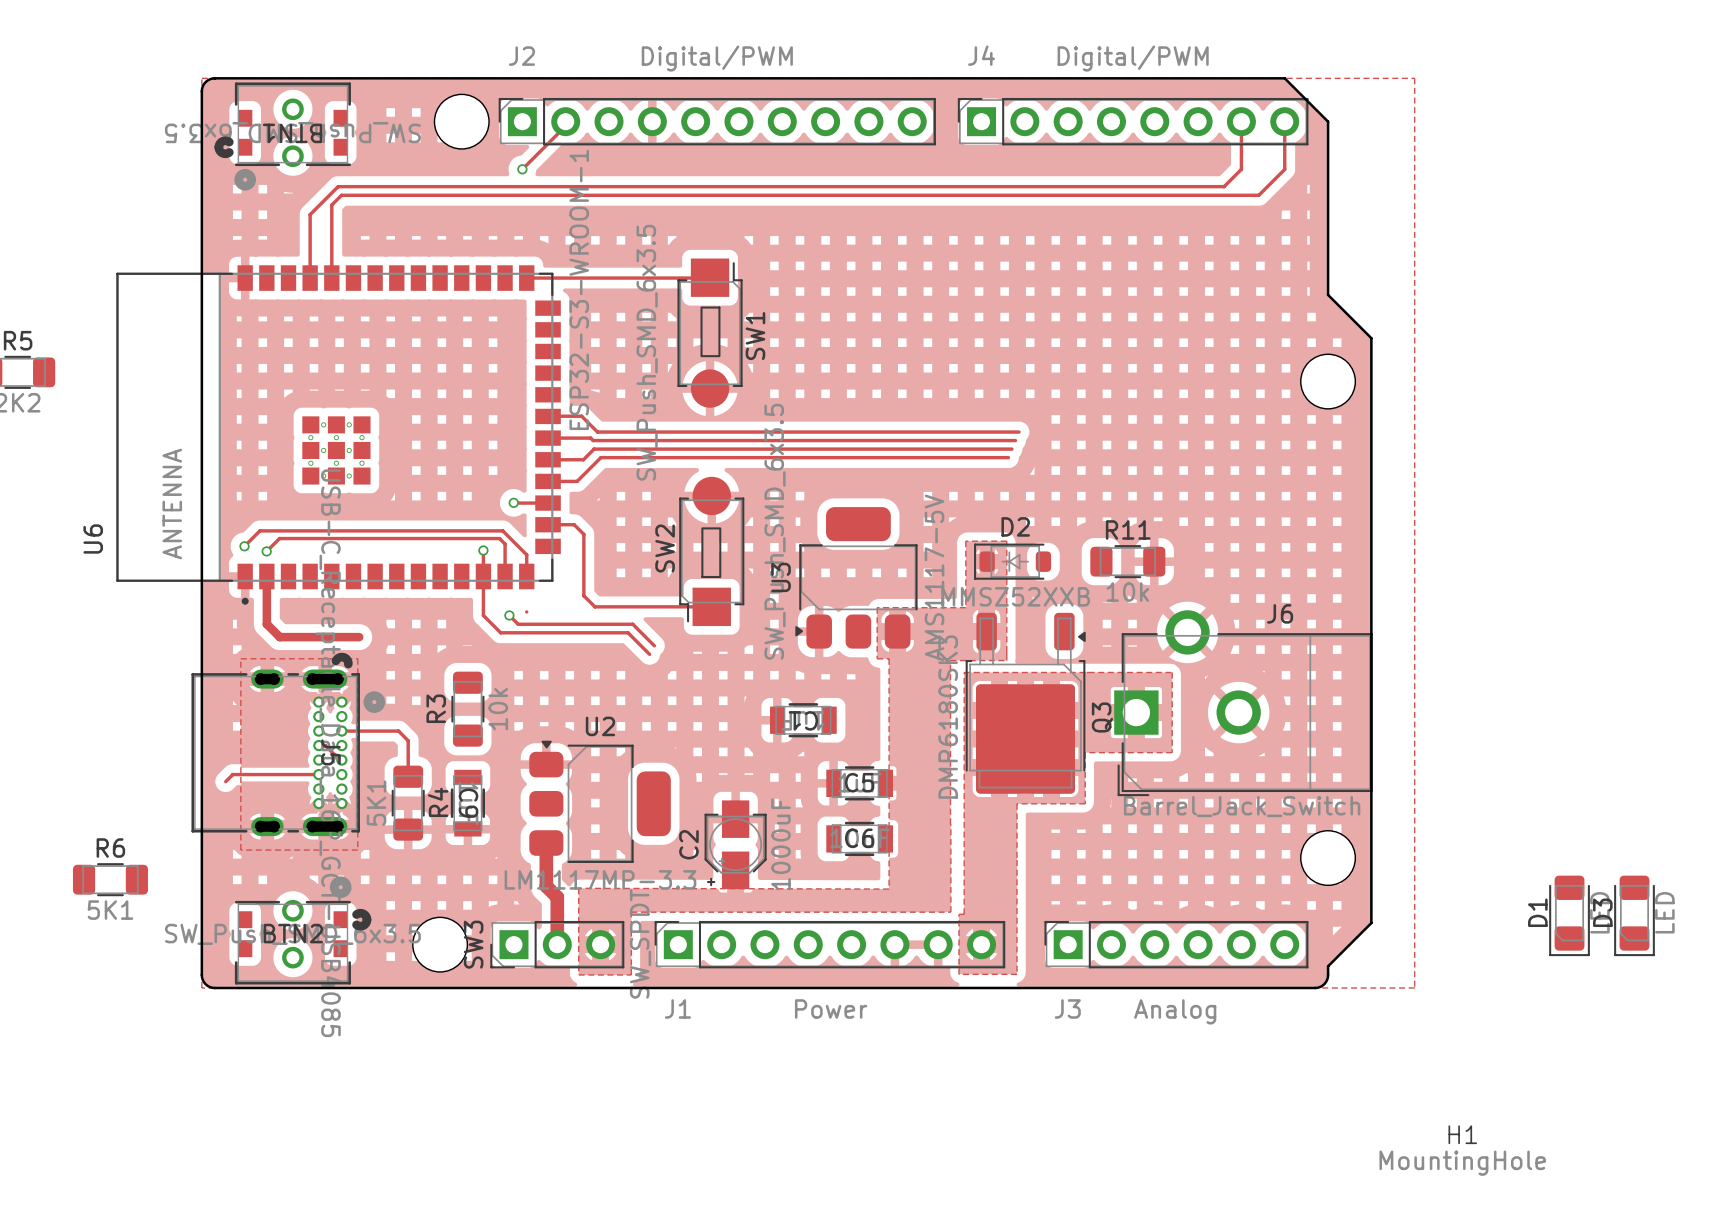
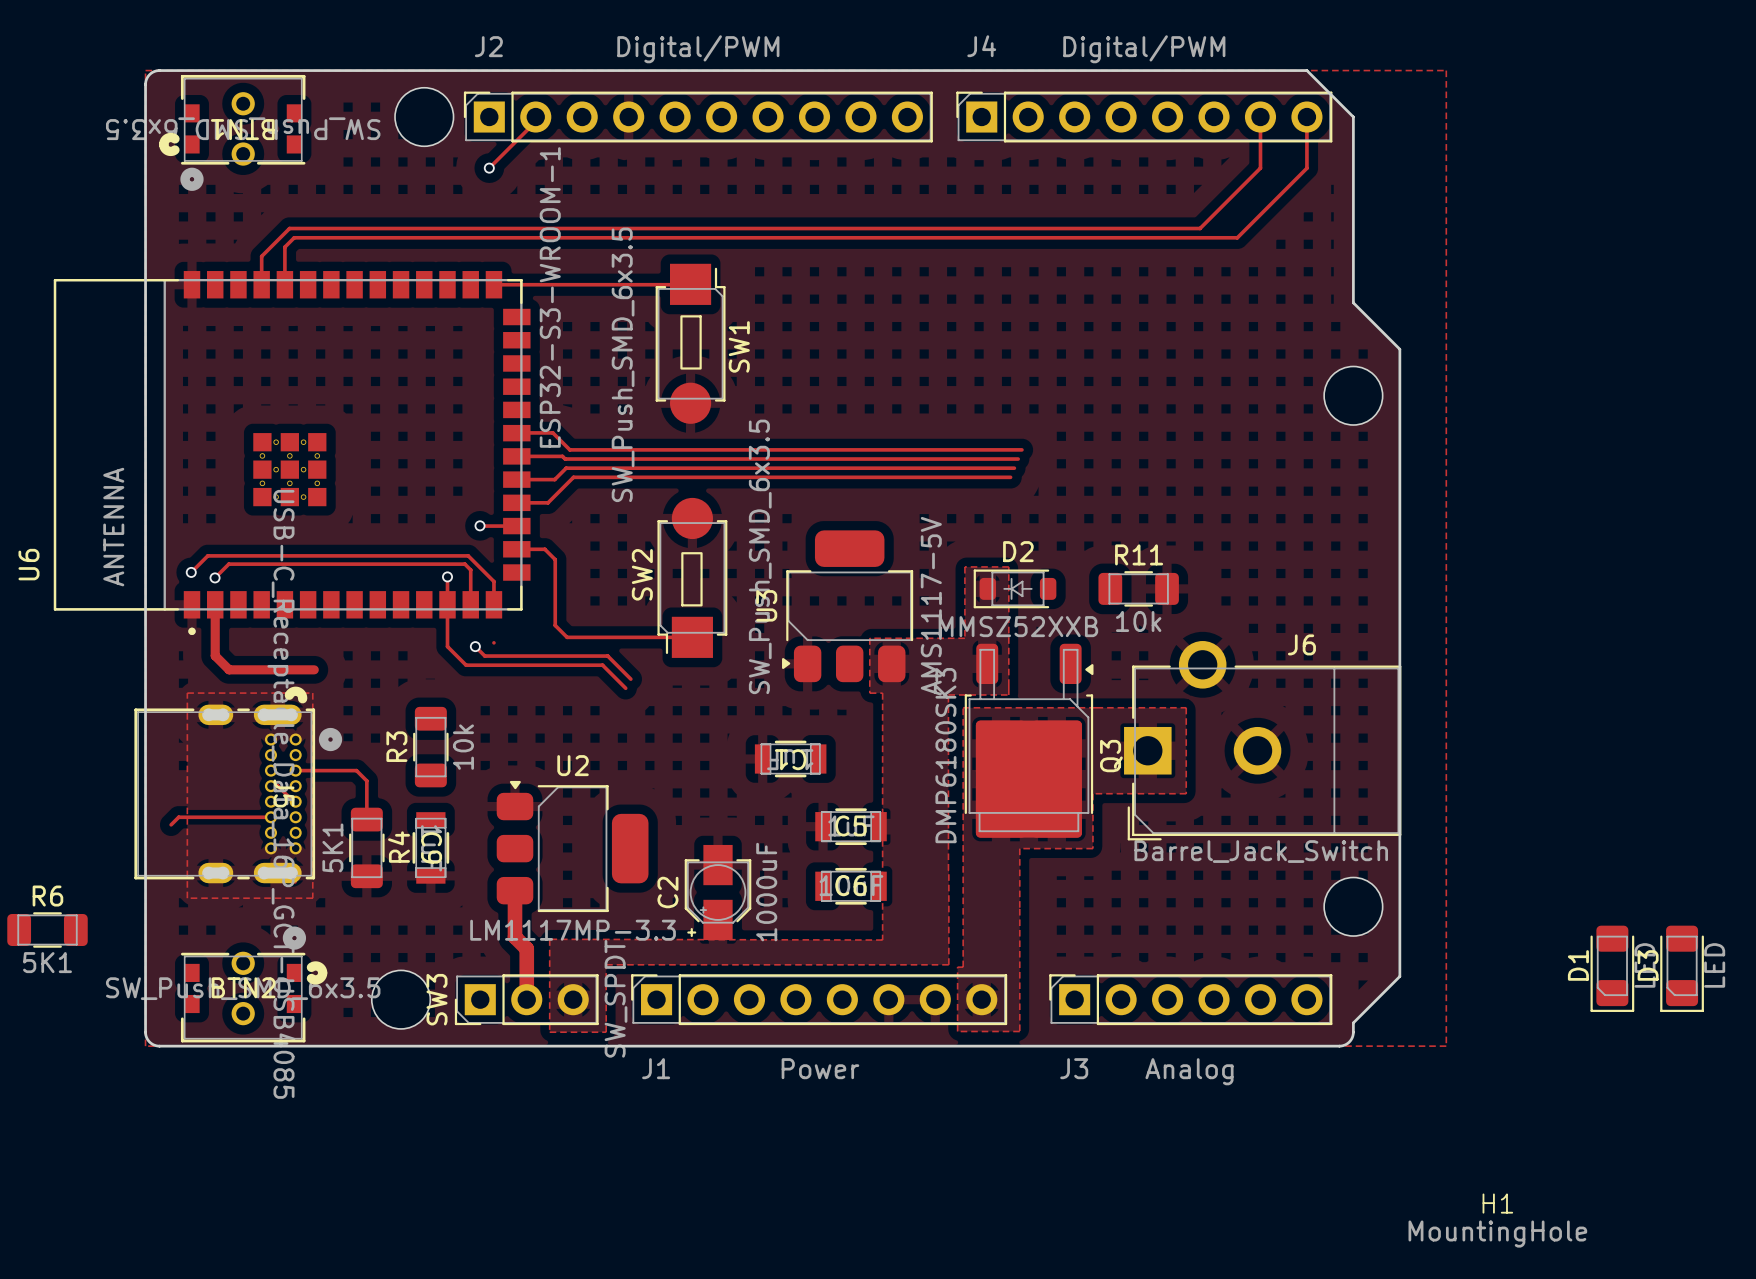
track: (1224, 186) (338, 186) (310, 214) (310, 251) -> (1241, 186) (1200, 228) (289, 228) (261, 256)
track: (1258, 195) (341, 195) (331, 205) (331, 242) -> (1279, 195) (1237, 237) (294, 237) (284, 247)

